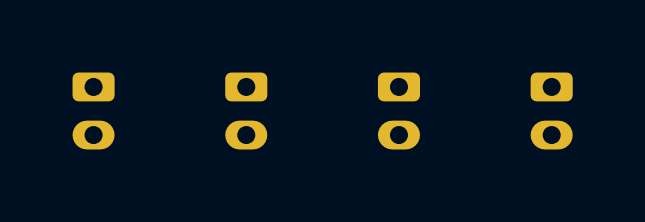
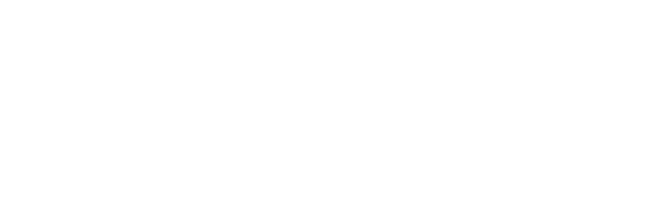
part: (93, 111) -> none
part: (246, 111) -> none
part: (398, 111) -> none
part: (551, 111) -> none

